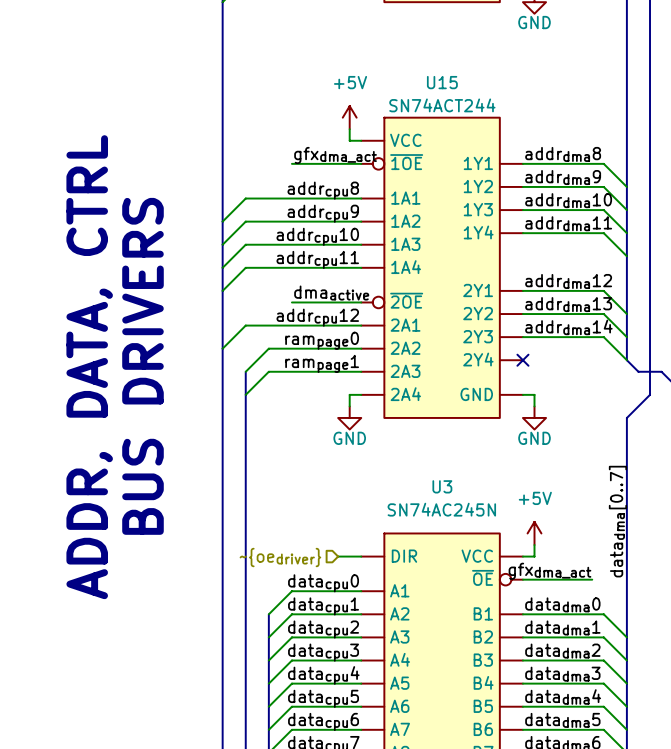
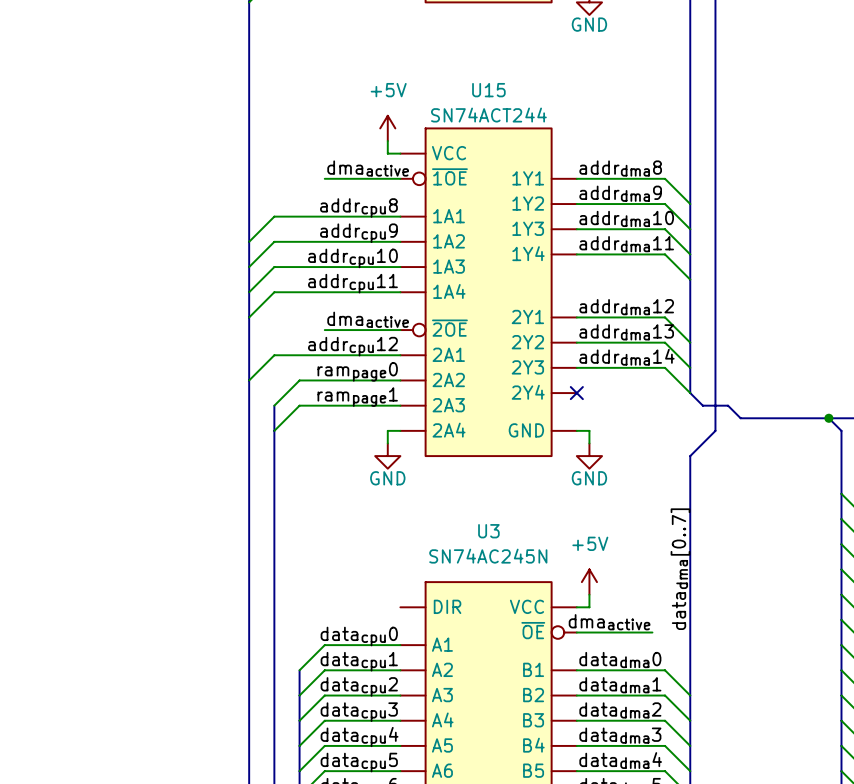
label: gfxdma_act (335, 155) -> dmaactive (368, 168)
text: BUS DRIVERS (142, 366) -> none
text: ADDR, DATA, CTRL (89, 367) -> none
wire: (338, 556) (361, 556) -> none
hierarchical label: ~{oedriver} (280, 557) -> none
label: gfxdma_act (549, 571) -> dmaactive (609, 622)

